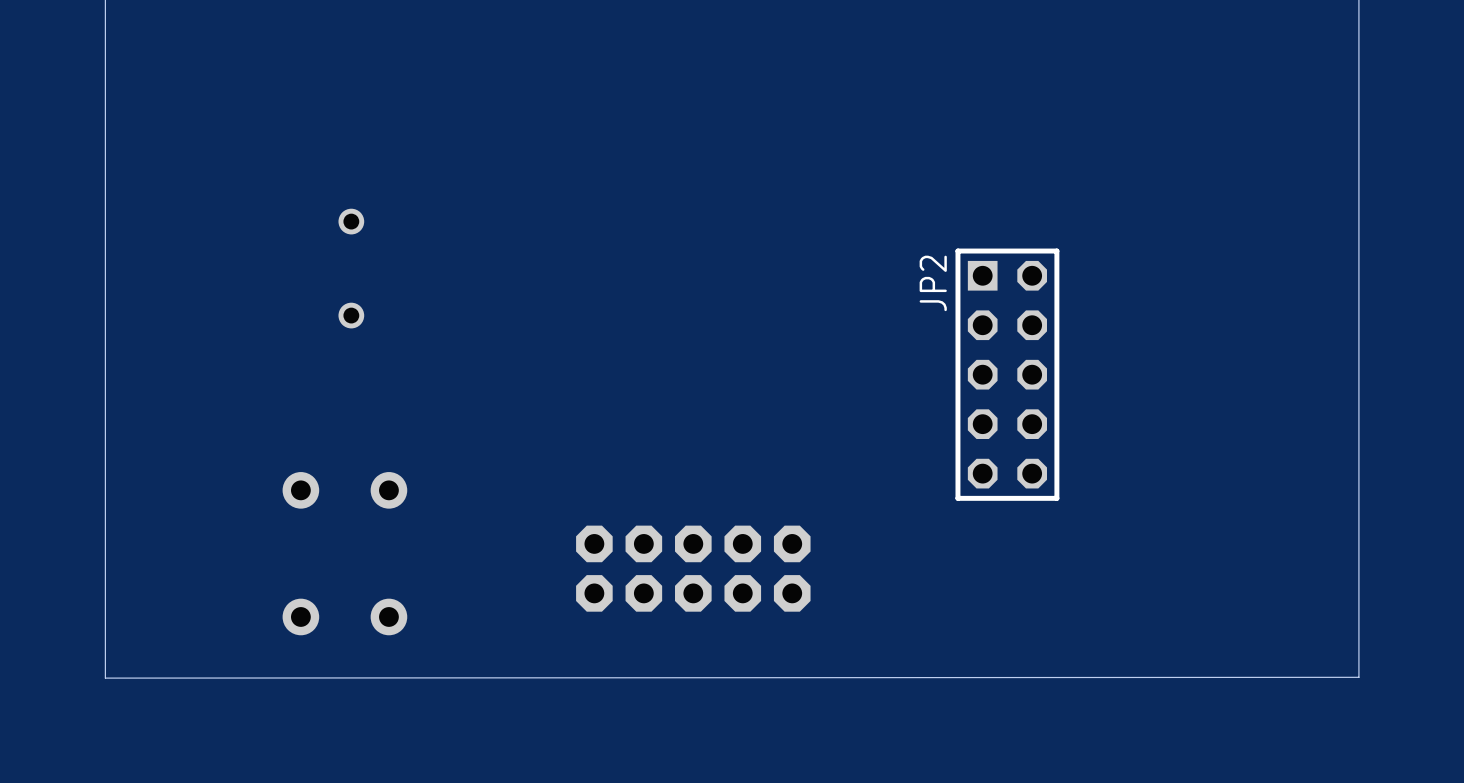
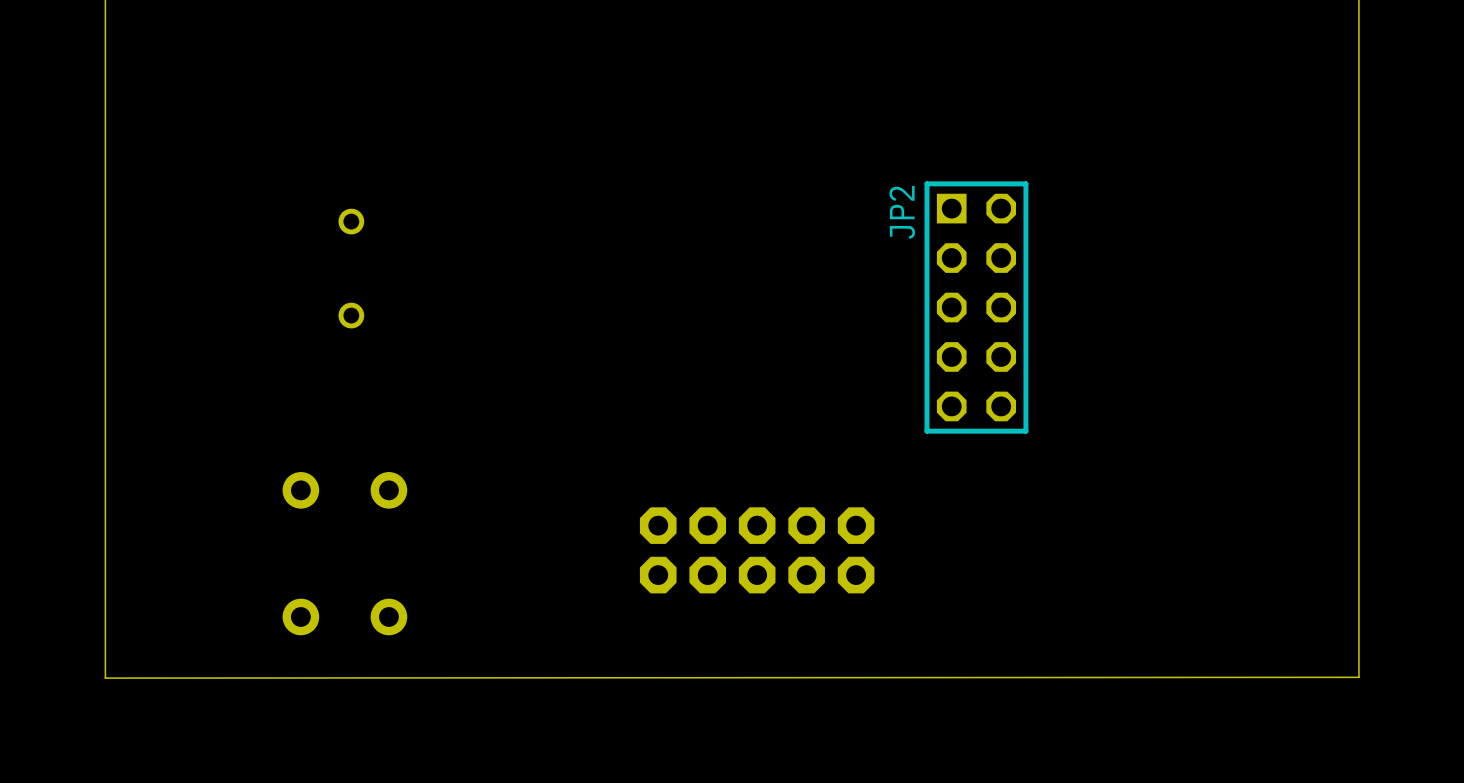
JP2 position: (1007, 374) -> (976, 307)
part position: (693, 568) -> (757, 550)

